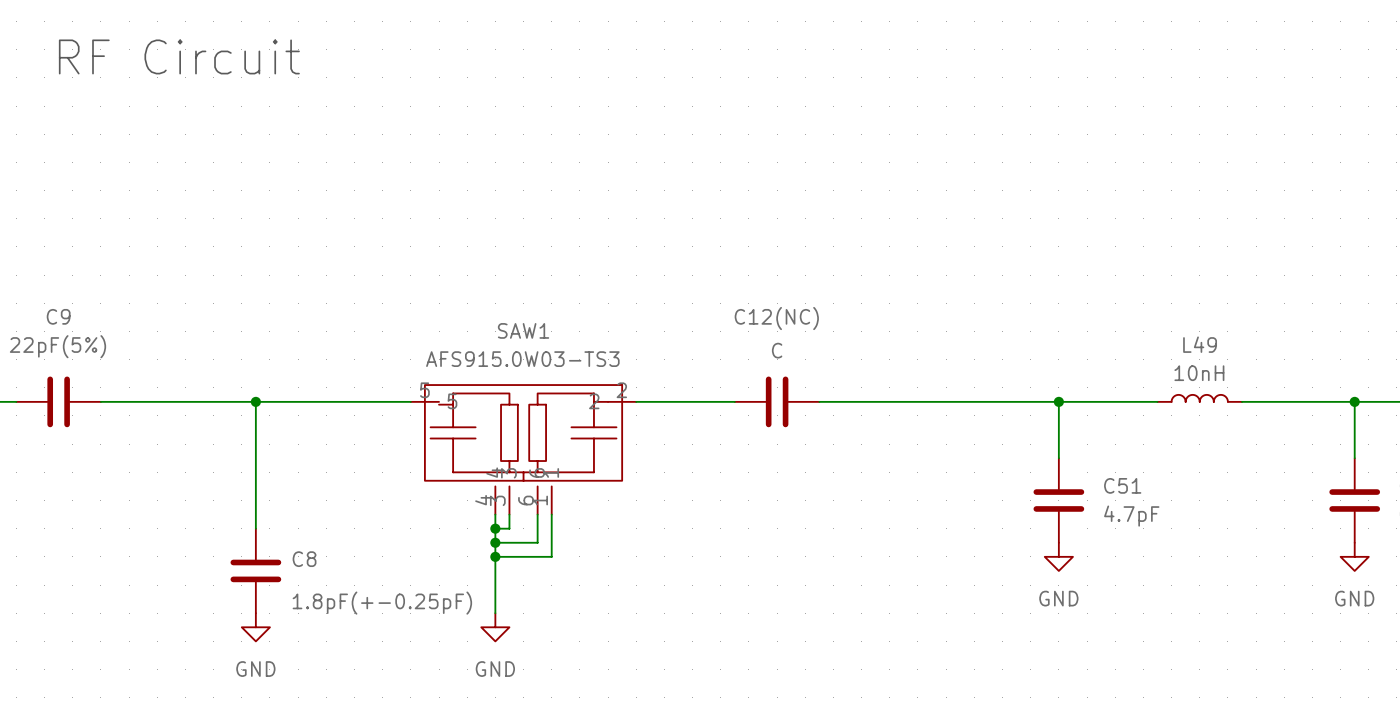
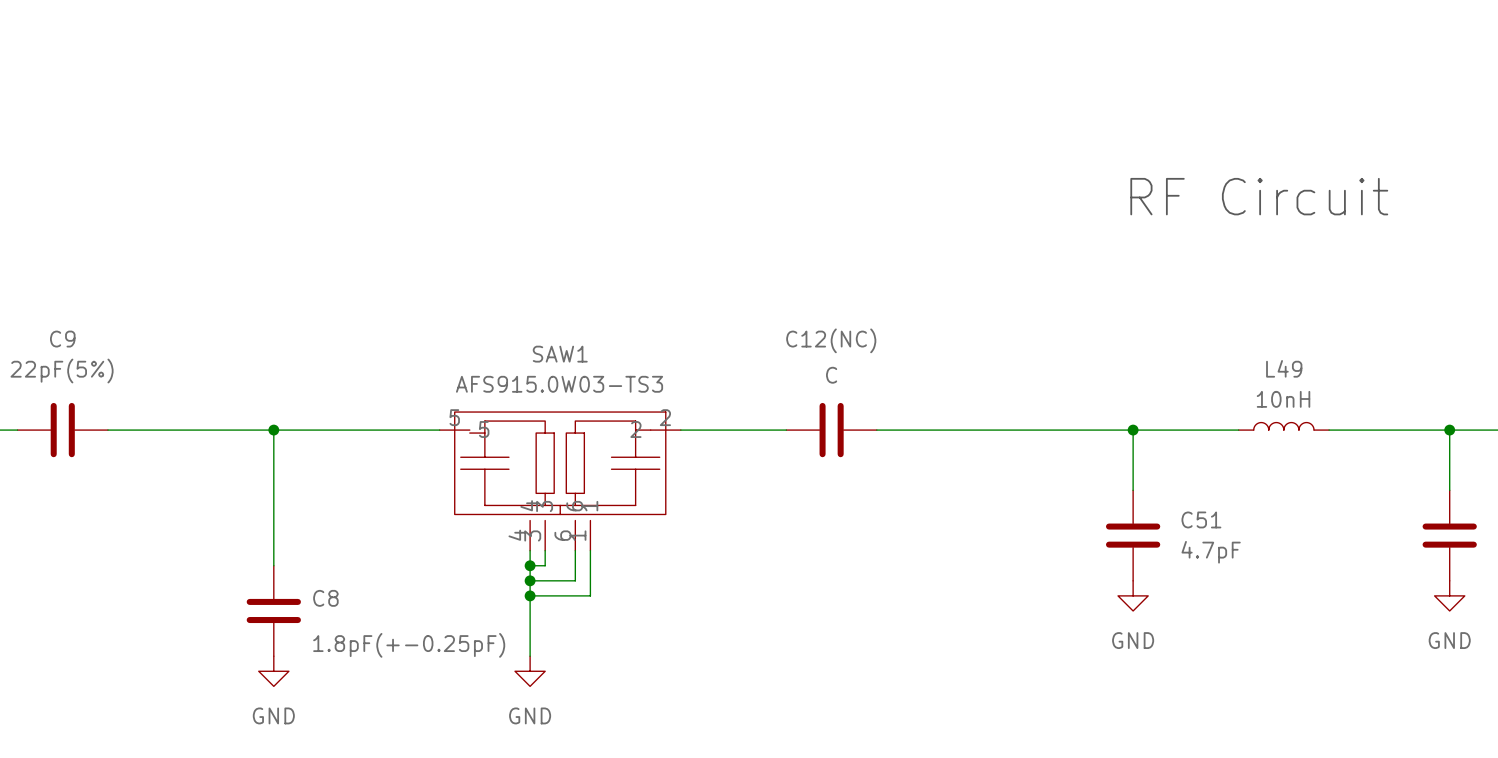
text: RF Circuit (179, 56) -> none
text: none -> RF Circuit (1259, 196)

